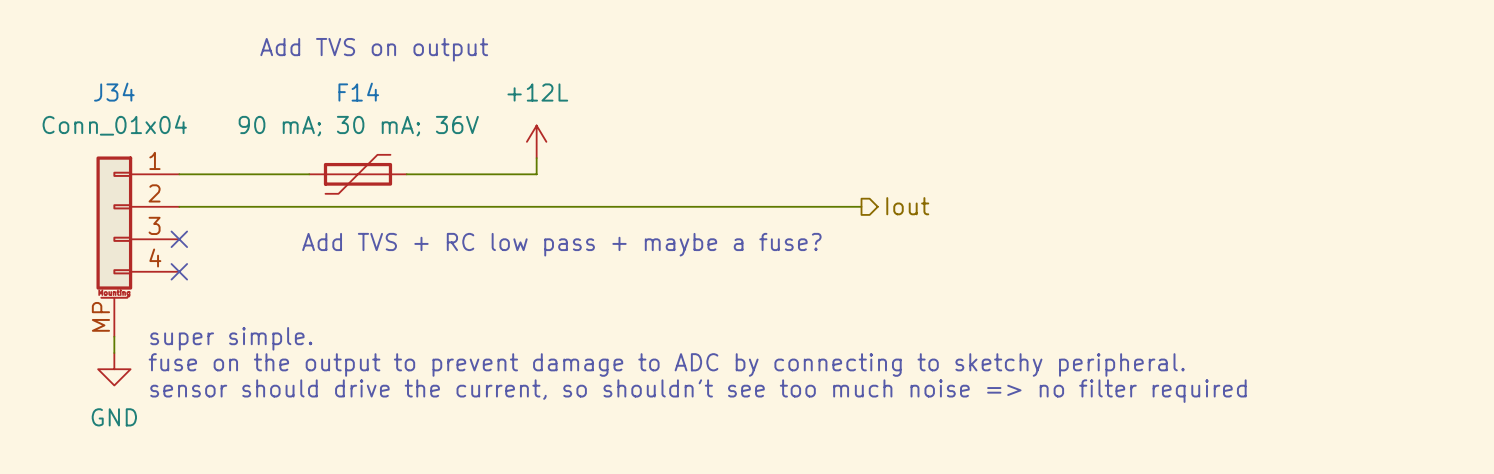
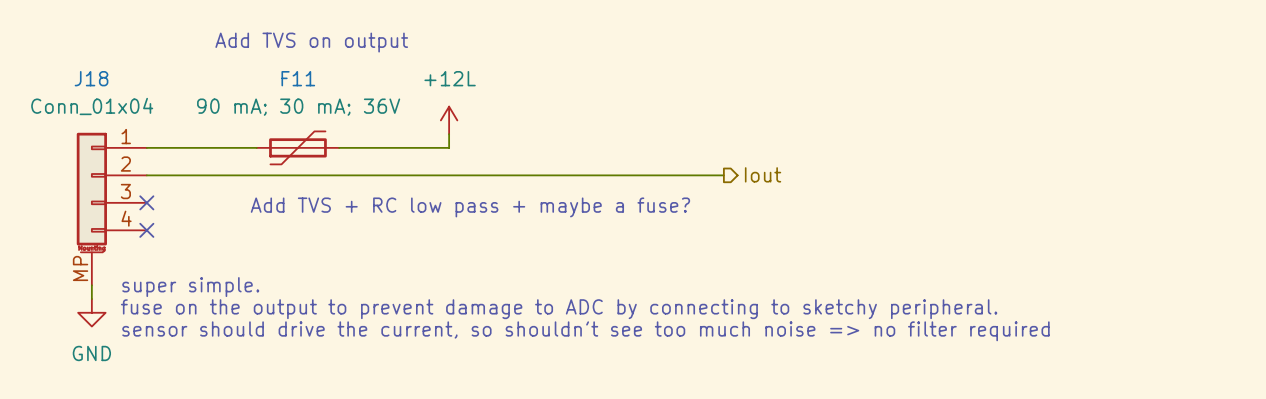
J34 name: J34 (114, 92) -> J18 (91, 78)
F14 name: F14 (358, 92) -> F11 (298, 78)

